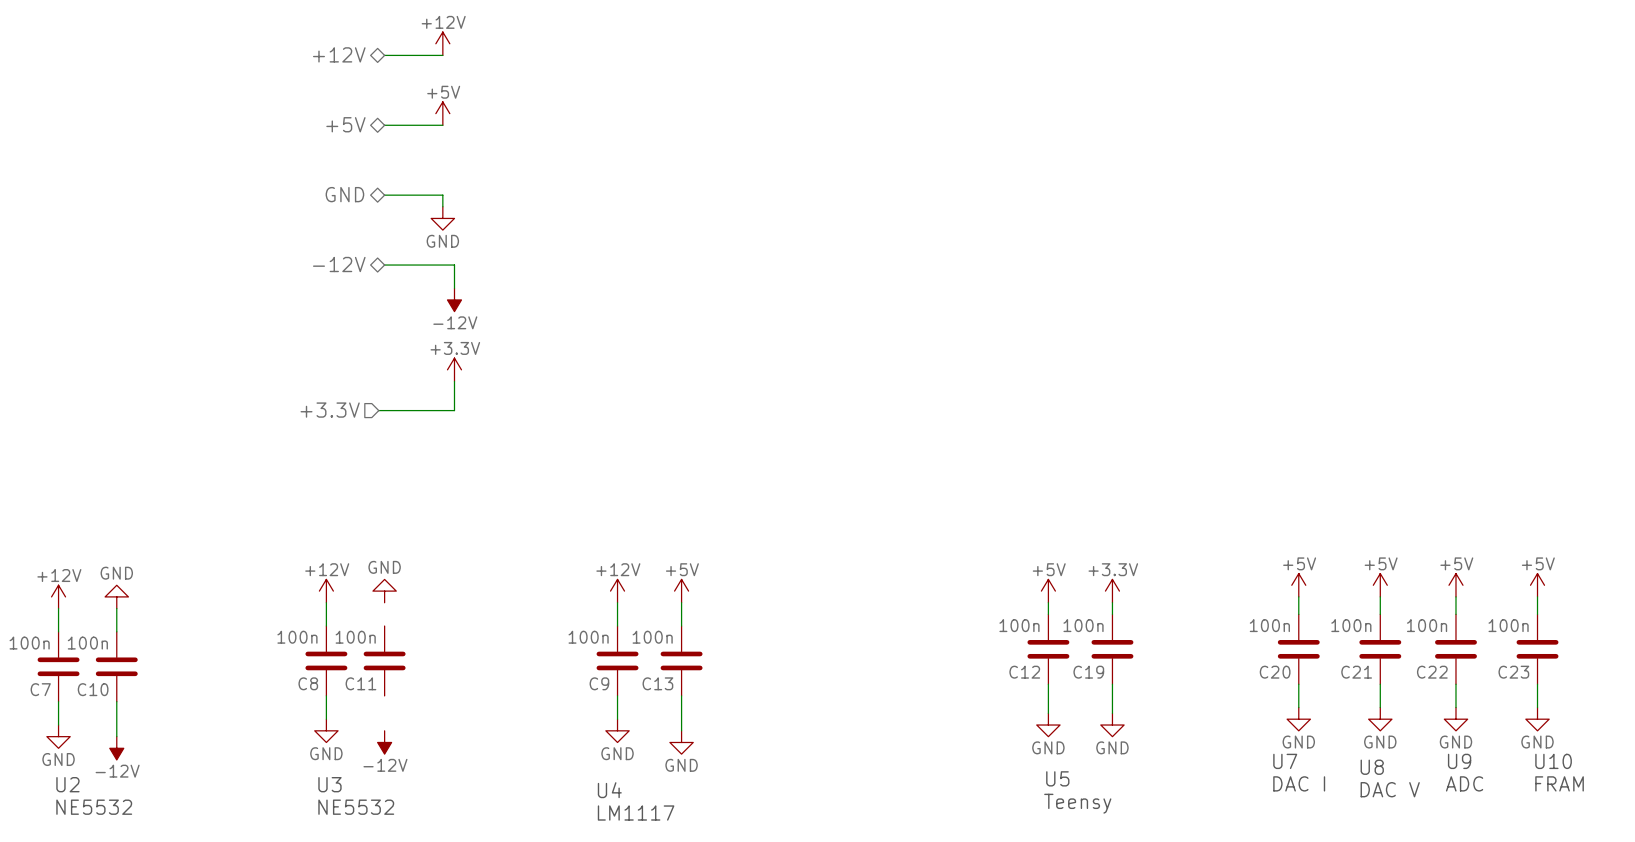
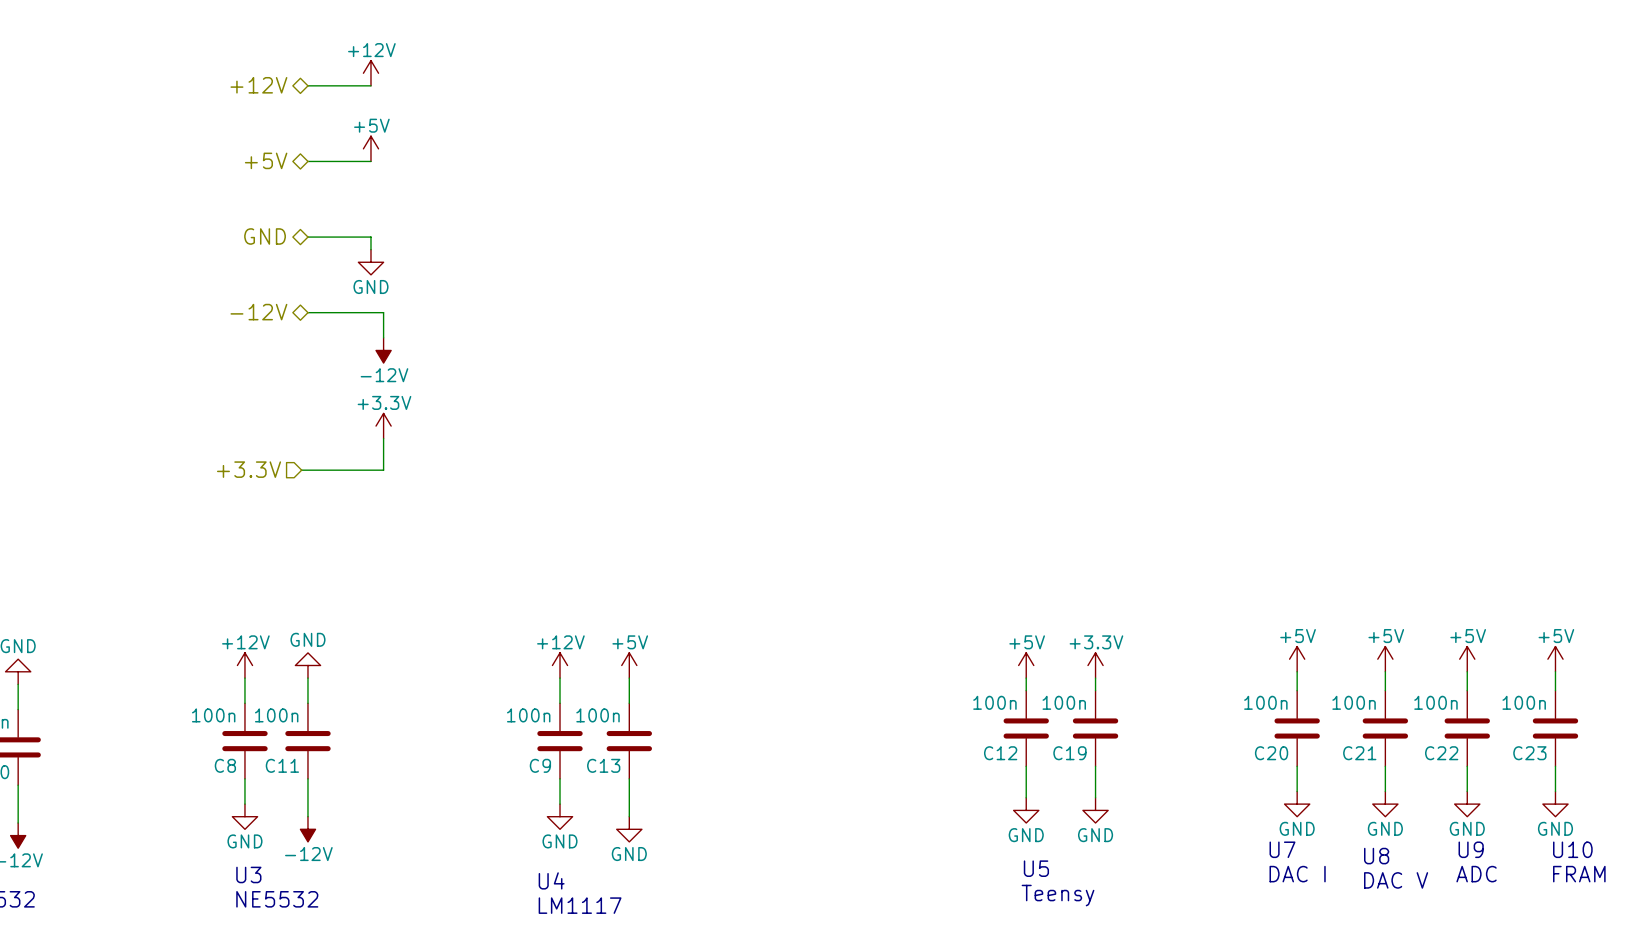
wire: none -> (307, 678) (307, 703)
wire: none -> (307, 778) (307, 816)

